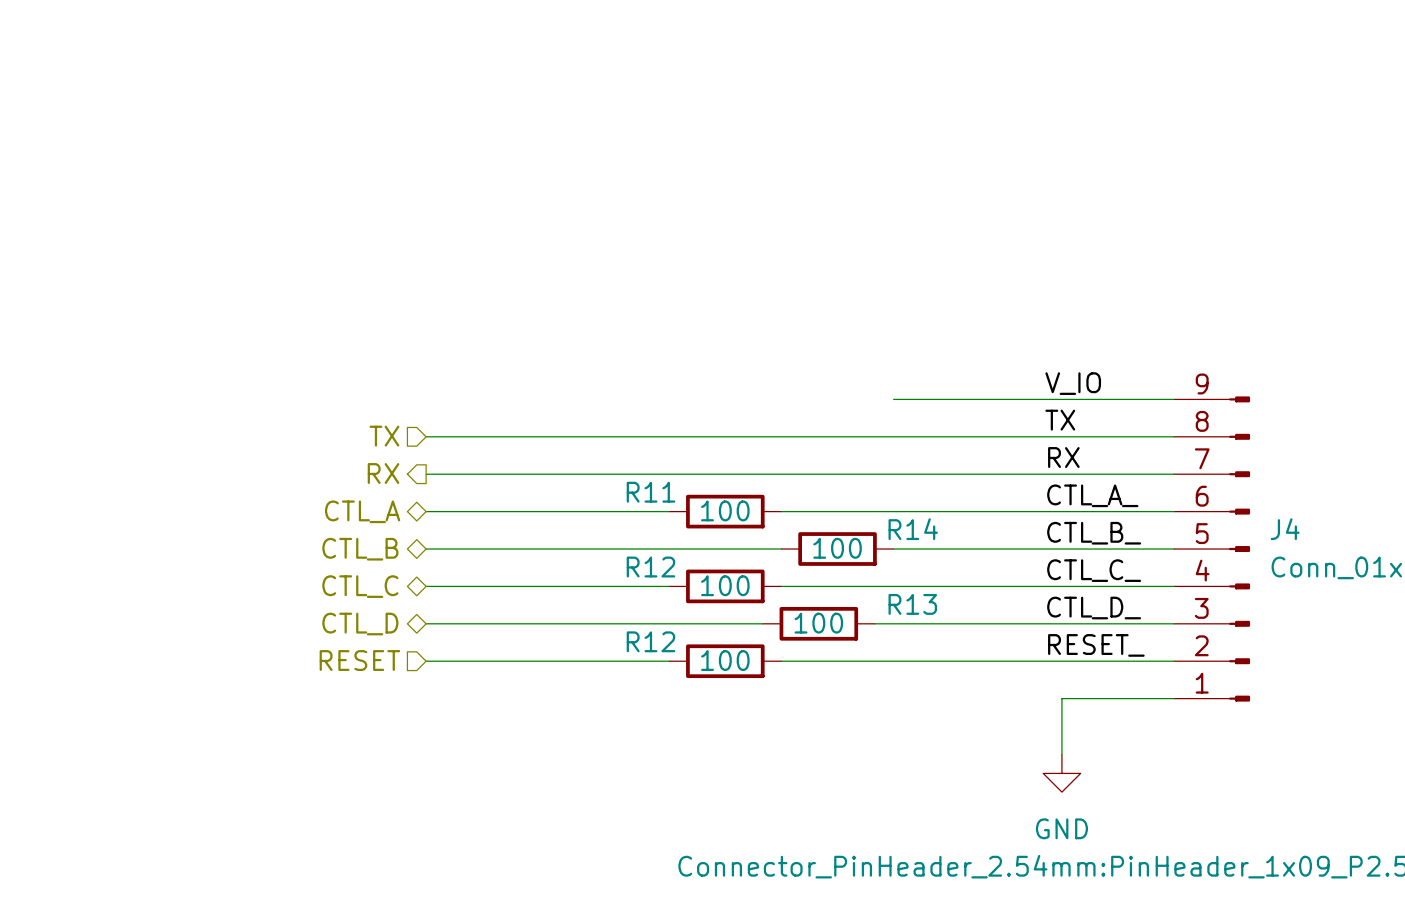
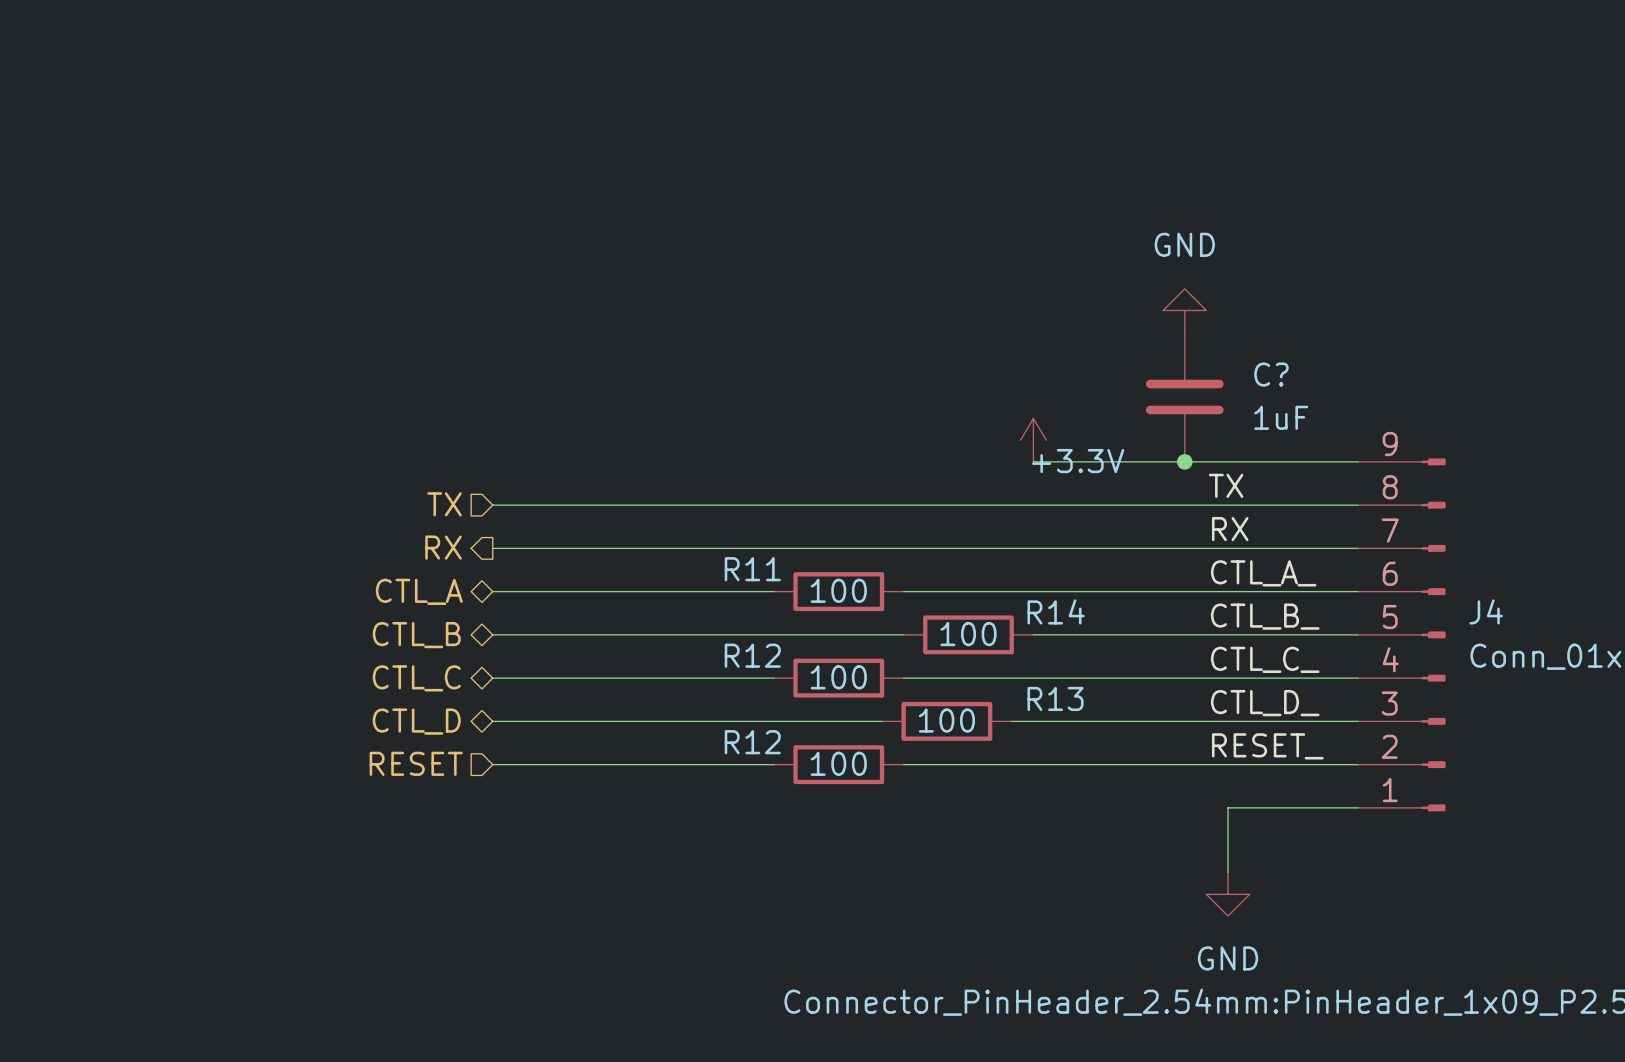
power symbol: none -> GND (1184, 310)
C?: none -> 1uF (1184, 397)
power symbol: none -> +3.3V (1033, 440)
label: V_IO (1073, 383) -> none
junction: none -> (1184, 461)

